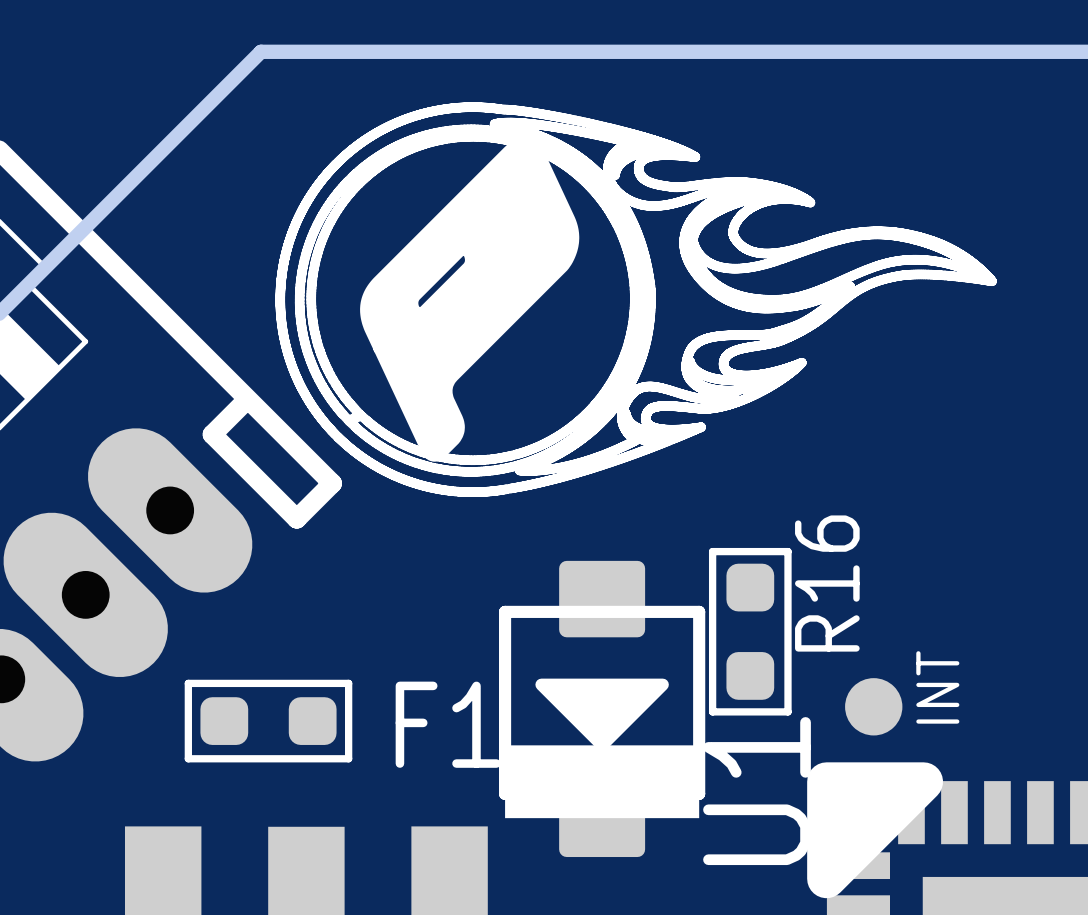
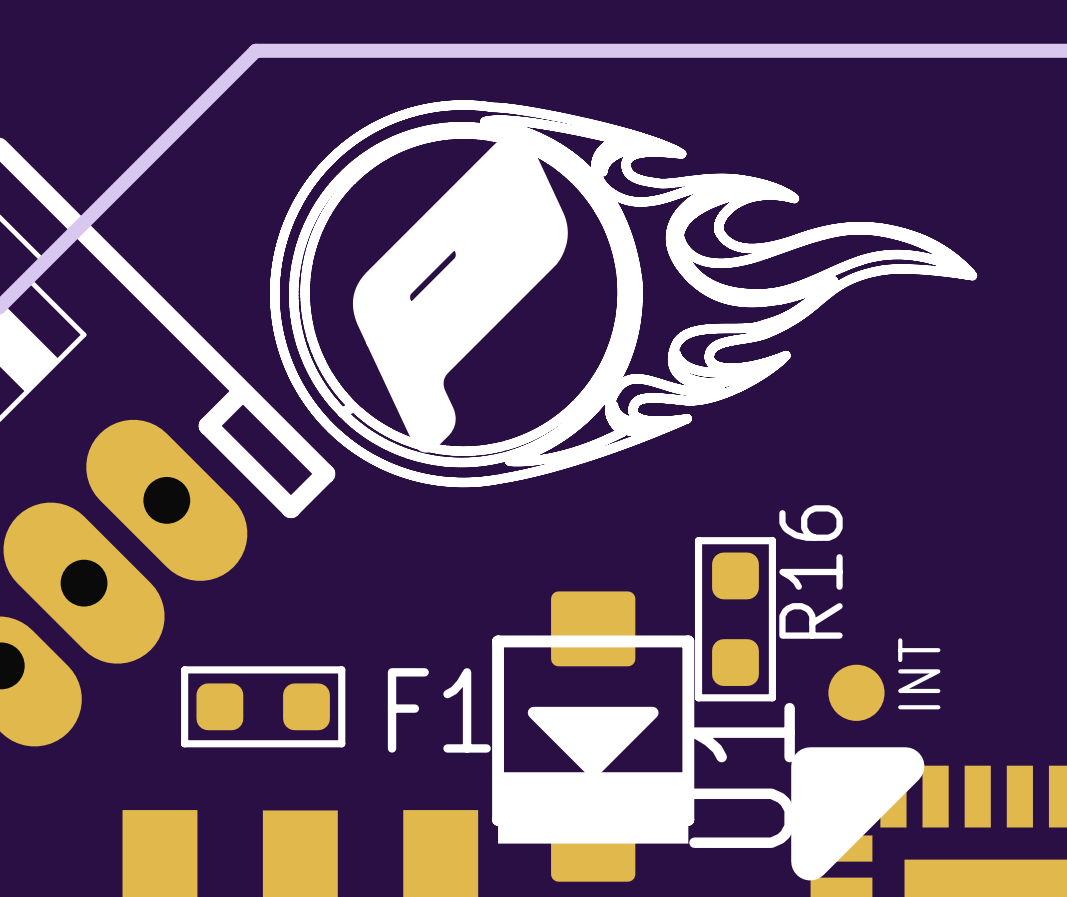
part position: (602, 708) -> (593, 736)

